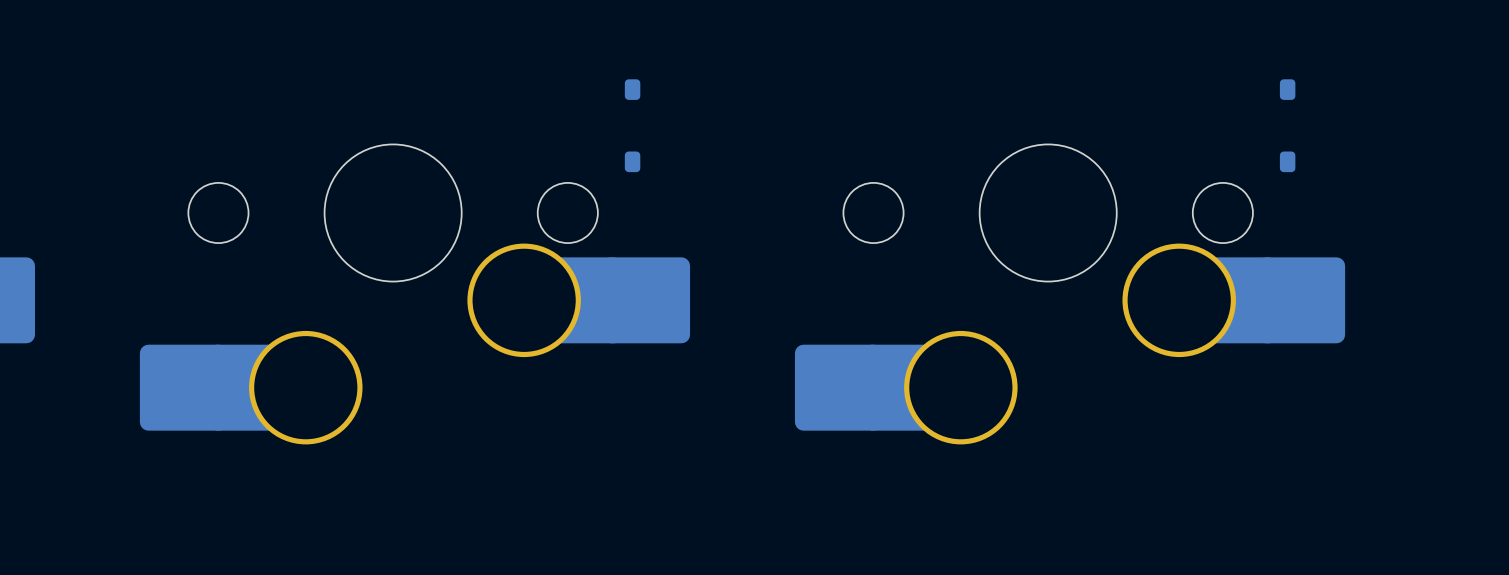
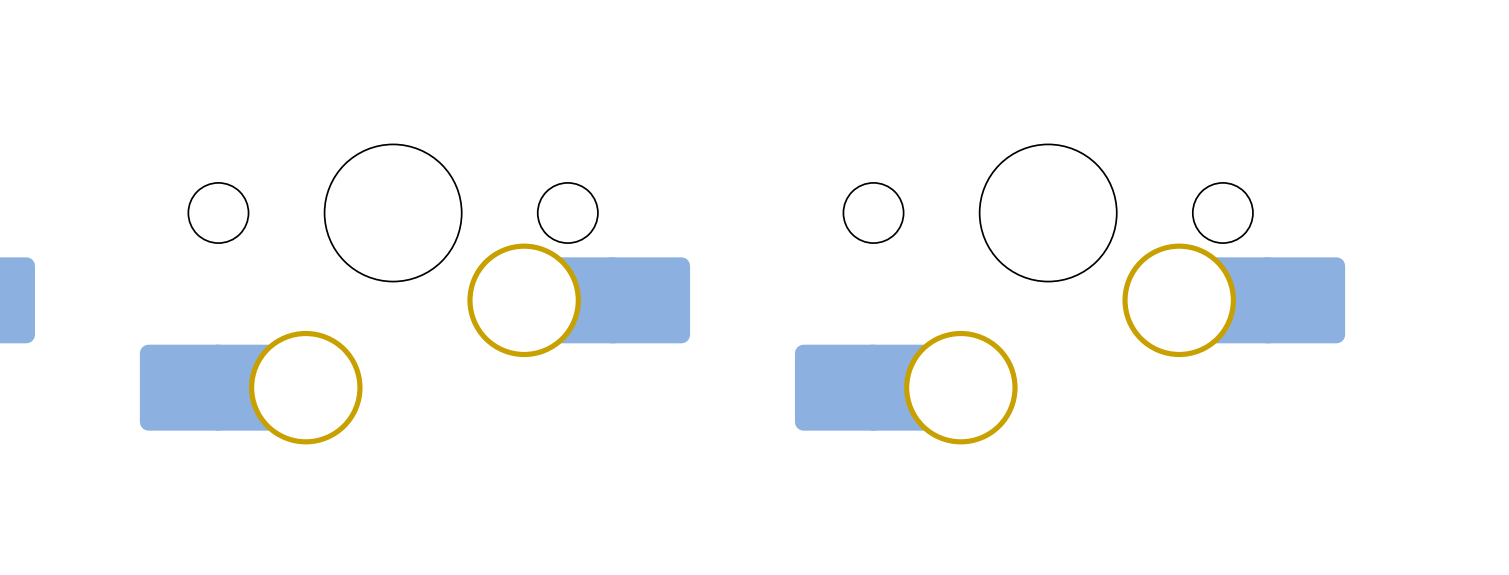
part: (632, 125) -> none
part: (1287, 125) -> none

